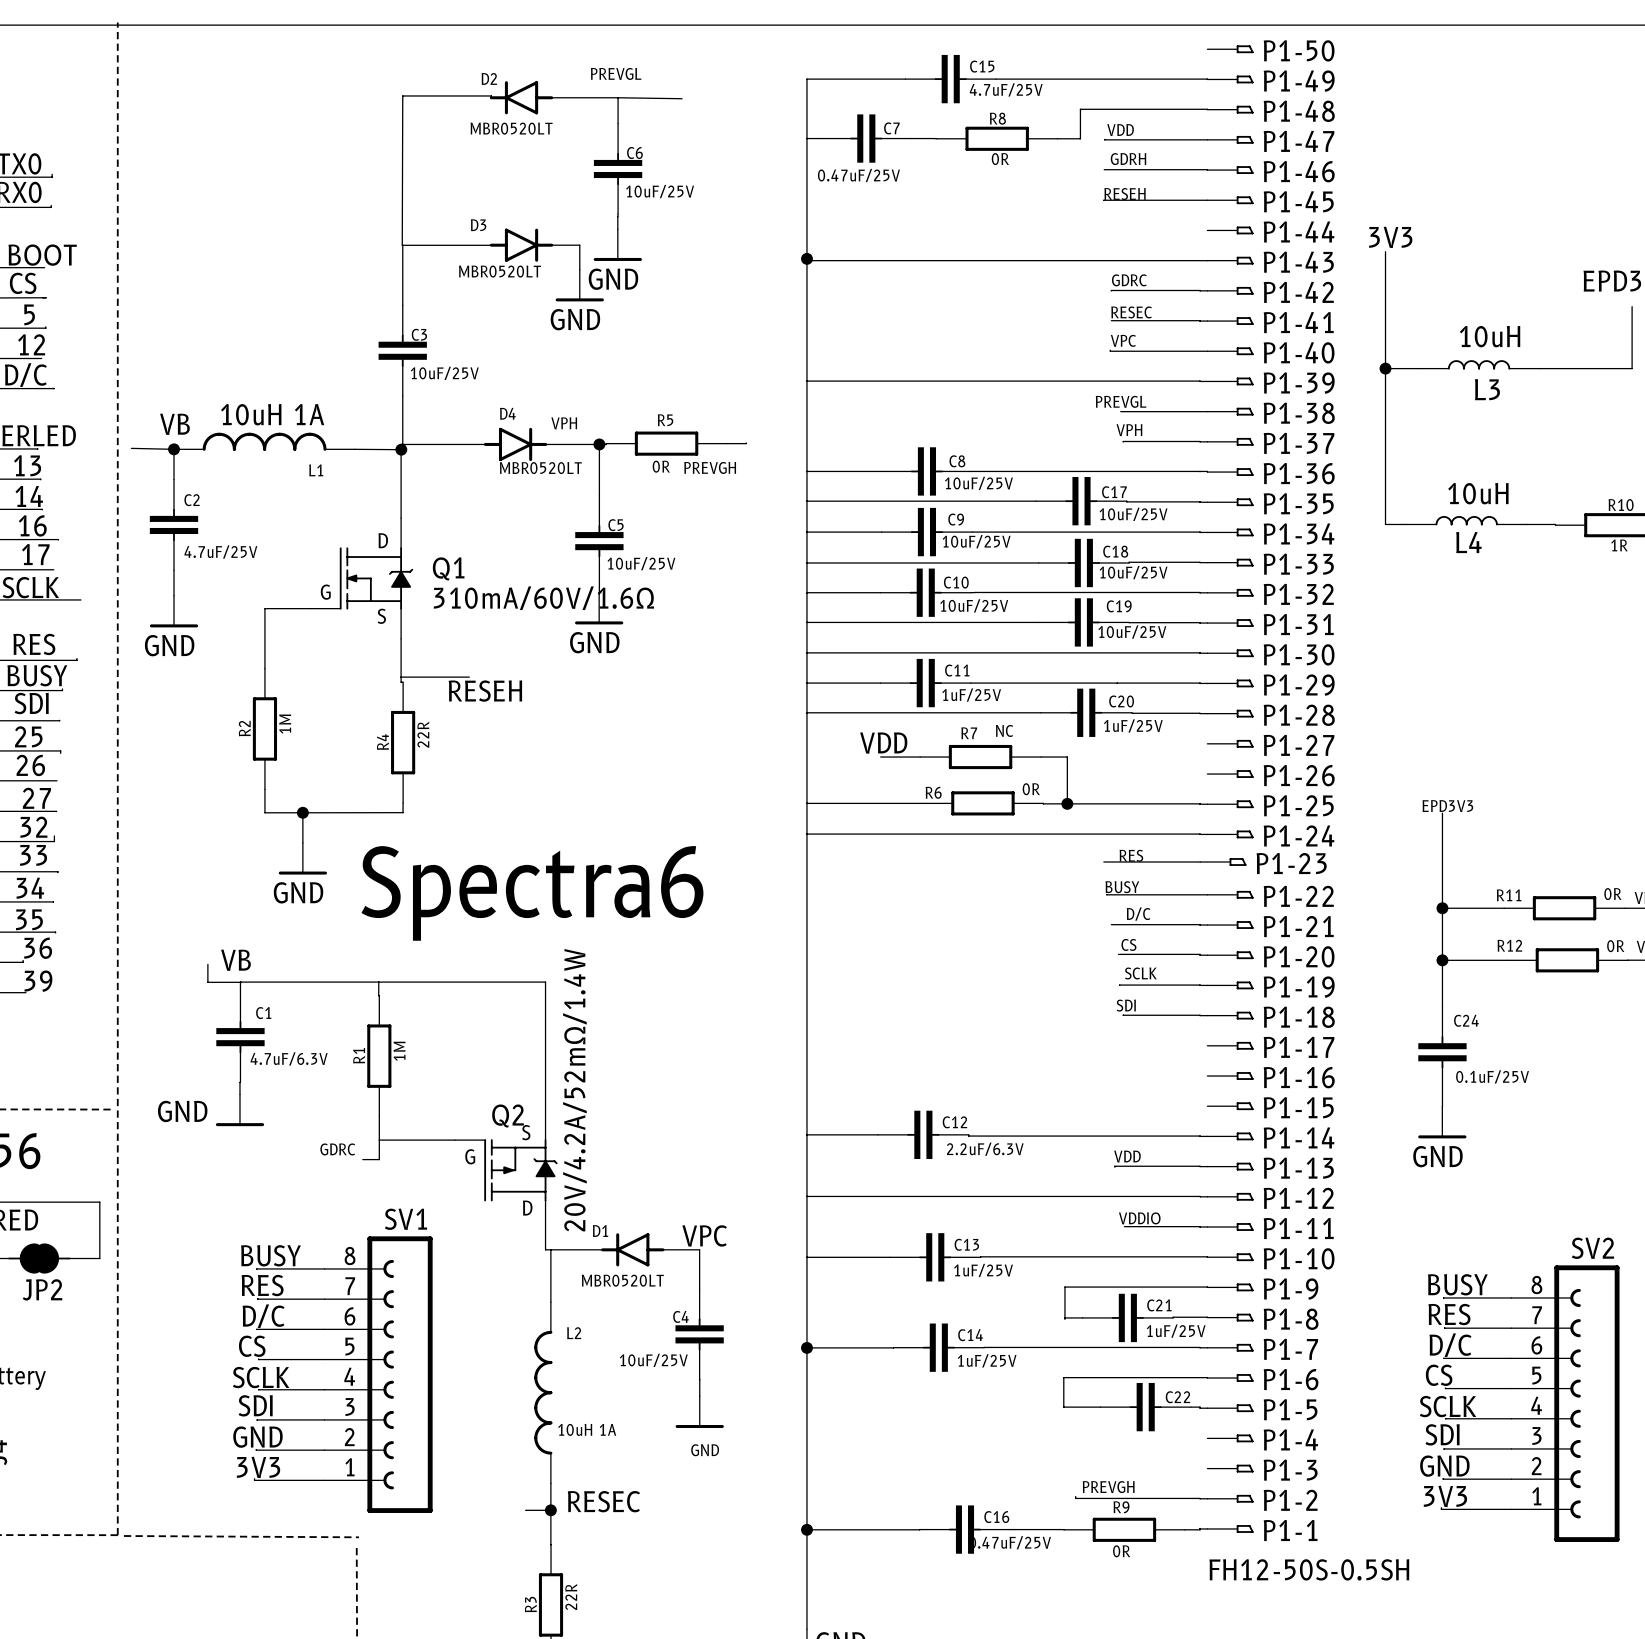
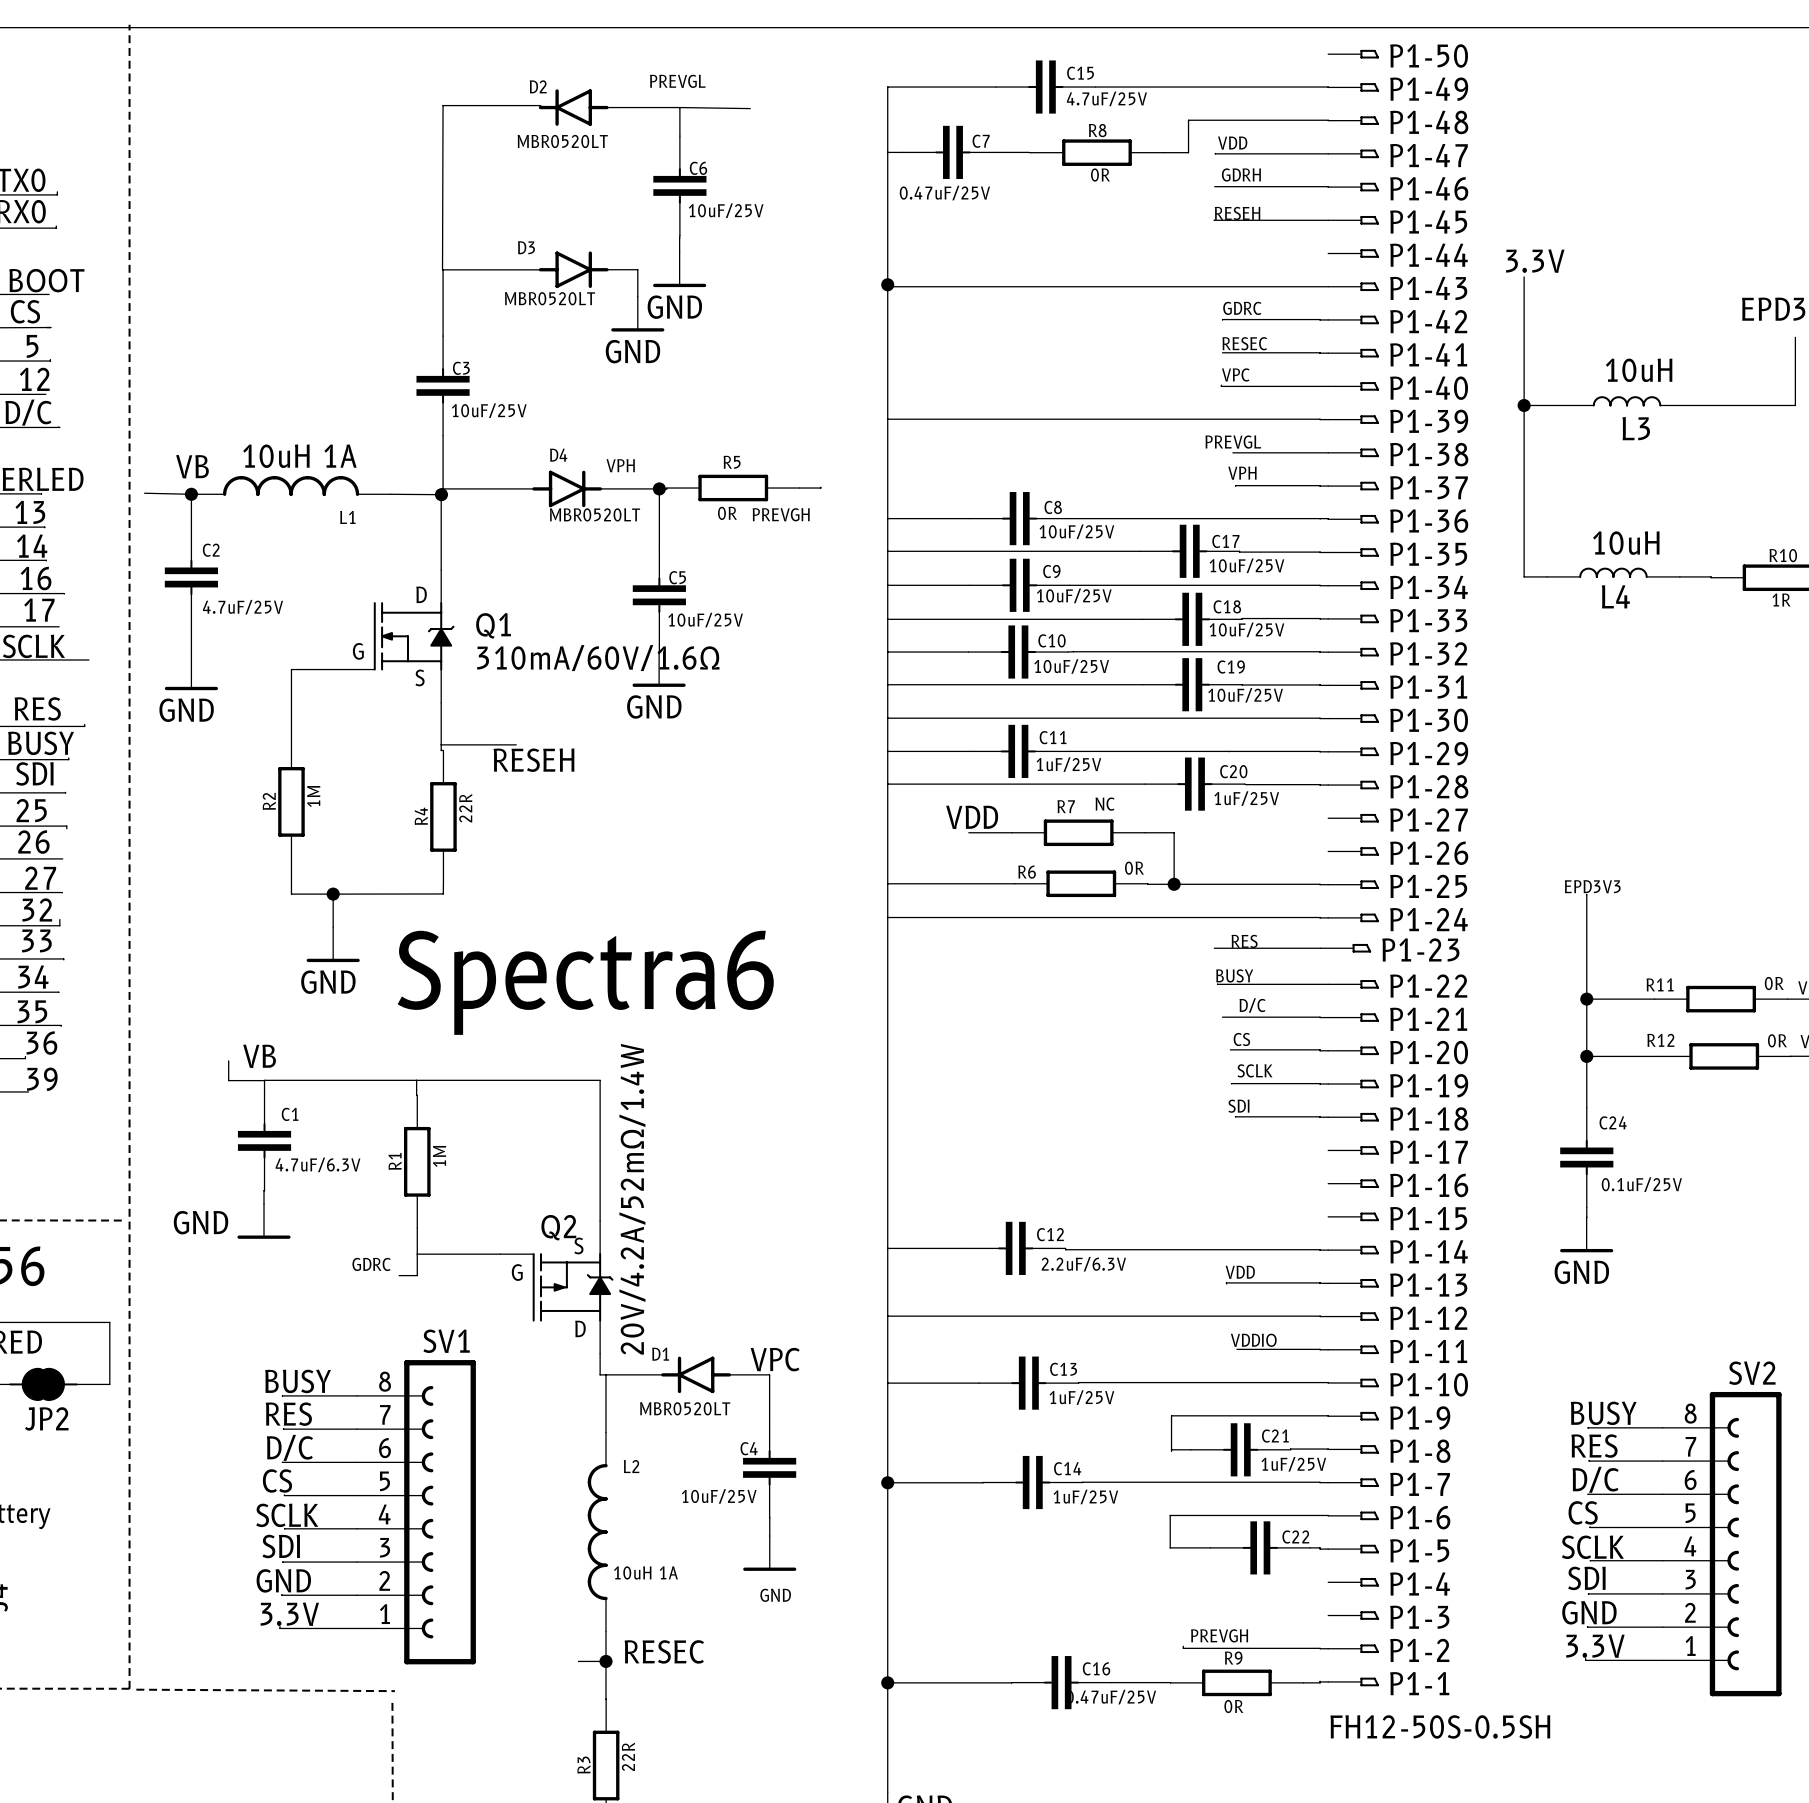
label: 3V3 (1390, 237) -> 3.3V (1535, 261)
label: 3V3 (258, 1467) -> 3.3V (289, 1614)
label: 3V3 (1445, 1496) -> 3.3V (1595, 1646)

